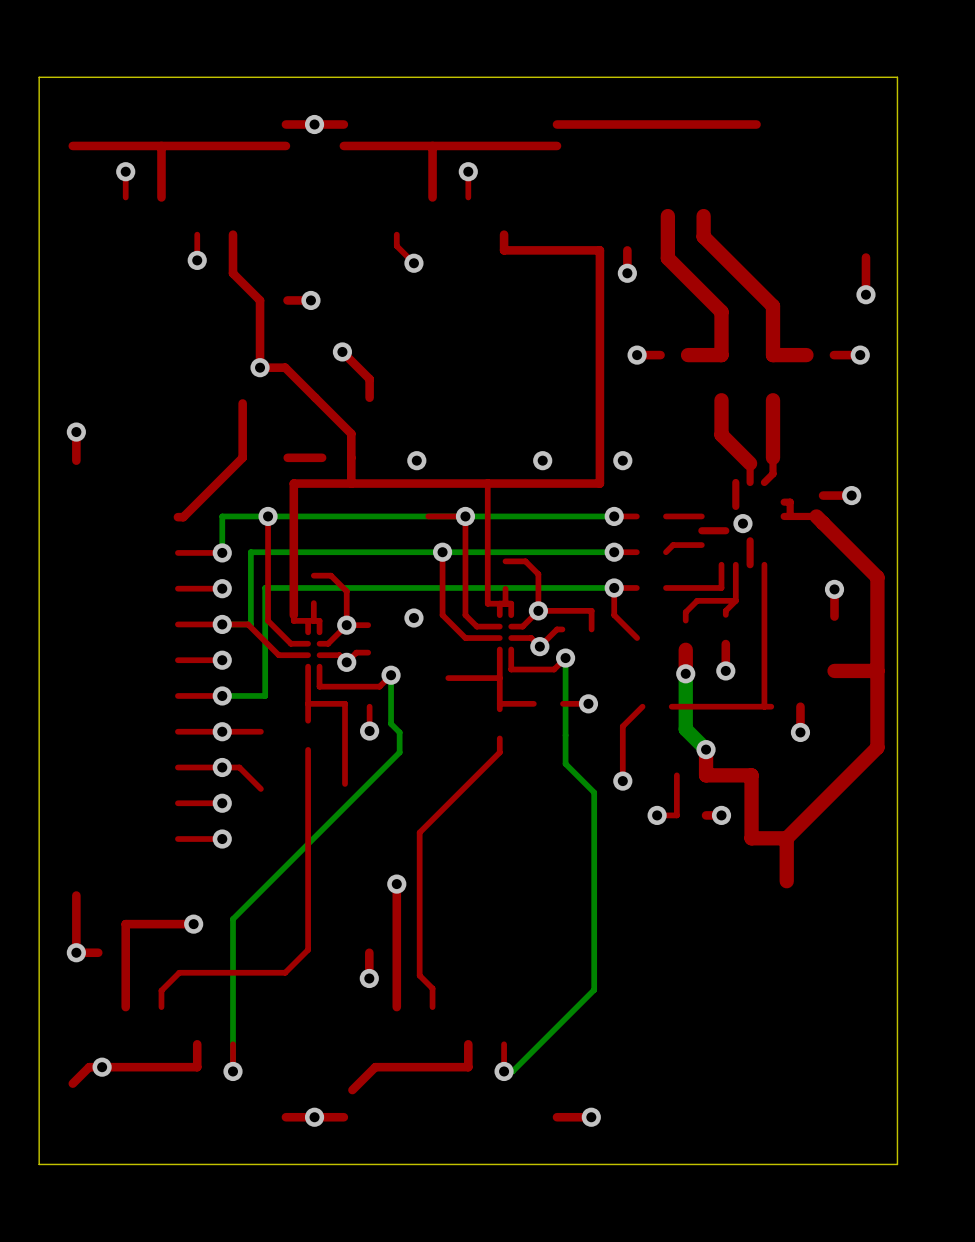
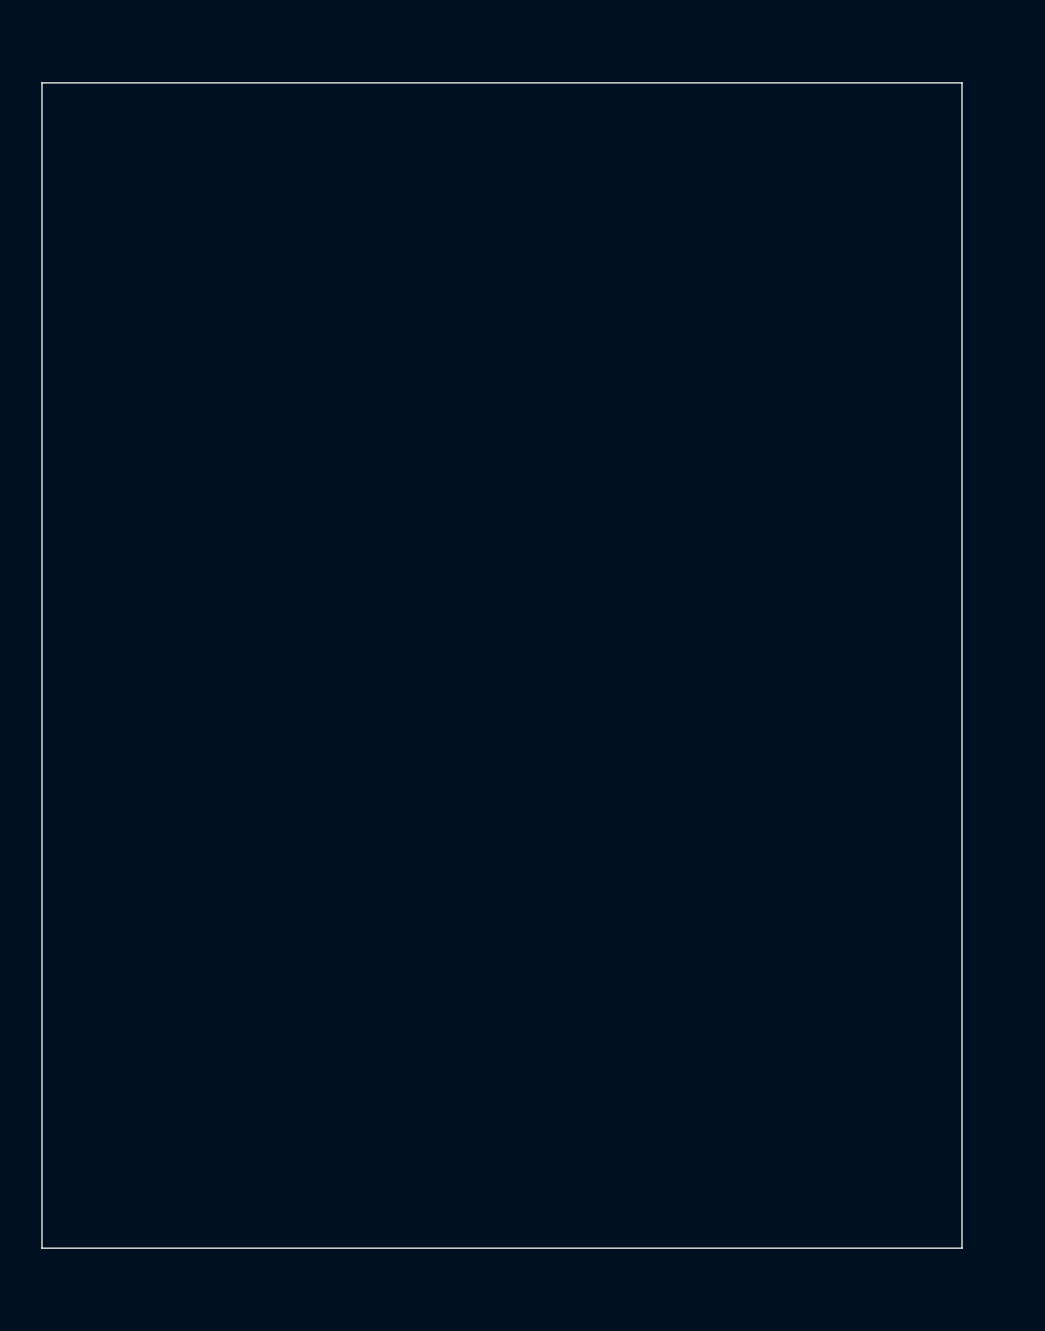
top track: (285, 124) (343, 124) -> none
via: (314, 124) -> none
top track: (557, 124) (756, 124) -> none
top track: (72, 145) (285, 145) -> none
top track: (161, 145) (161, 197) -> none
top track: (343, 145) (557, 145) -> none
top track: (432, 145) (432, 197) -> none
top track: (125, 171) (125, 197) -> none
via: (125, 171) -> none
top track: (468, 171) (468, 197) -> none
via: (468, 171) -> none
top track: (667, 216) (667, 258) (721, 311) (721, 355) (688, 355) -> none
top track: (703, 216) (703, 236) (773, 306) (773, 355) (806, 355) -> none
top track: (197, 234) (197, 260) -> none
top track: (233, 234) (233, 273) (260, 300) (260, 367) (285, 367) (351, 433) (351, 483) -> none
top track: (396, 234) (396, 246) (413, 263) -> none
top track: (504, 234) (504, 250) (599, 250) (599, 483) (293, 483) (293, 620) (319, 620) (319, 632) -> none
top track: (627, 250) (627, 273) -> none
top track: (865, 257) (865, 294) -> none
via: (197, 260) -> none
via: (413, 263) -> none
via: (627, 273) -> none
via: (865, 294) -> none
top track: (287, 300) (310, 300) -> none
via: (310, 300) -> none
top track: (342, 351) (369, 379) (369, 397) -> none
via: (342, 351) -> none
top track: (637, 355) (660, 355) -> none
via: (637, 355) -> none
top track: (833, 355) (860, 355) -> none
via: (860, 355) -> none
via: (260, 367) -> none
top track: (721, 400) (721, 434) (750, 463) (750, 482) -> none
top track: (773, 400) (773, 473) (764, 482) -> none
top track: (242, 403) (242, 457) (183, 517) (177, 517) -> none
top track: (76, 432) (76, 460) -> none
via: (76, 432) -> none
top track: (287, 457) (322, 457) -> none
via: (416, 460) -> none
via: (542, 460) -> none
via: (622, 460) -> none
top track: (735, 482) (735, 506) -> none
top track: (487, 483) (487, 603) (511, 603) (511, 615) -> none
top track: (823, 495) (851, 495) -> none
via: (851, 495) -> none
top track: (784, 502) (790, 502) (790, 516) -> none
top track: (268, 516) (268, 620) (290, 643) (308, 643) -> none
via: (268, 516) -> none
top track: (428, 516) (465, 516) (465, 615) (476, 626) (499, 626) -> none
via: (465, 516) -> none
top track: (614, 516) (636, 516) -> none
bottom track: (614, 516) (222, 516) (222, 552) -> none
via: (614, 516) -> none
top track: (666, 516) (701, 516) -> none
top track: (784, 516) (816, 516) (877, 577) (877, 747) (786, 838) -> none
via: (742, 523) -> none
top track: (701, 530) (725, 530) -> none
top track: (750, 540) (750, 564) -> none
top track: (701, 545) (673, 545) (666, 552) -> none
top track: (177, 552) (222, 552) -> none
via: (222, 552) -> none
top track: (442, 552) (442, 615) (465, 638) (499, 638) -> none
via: (442, 552) -> none
top track: (614, 552) (636, 552) -> none
bottom track: (614, 552) (250, 552) (250, 624) (222, 624) -> none
via: (614, 552) -> none
top track: (505, 561) (525, 561) (538, 574) (538, 610) -> none
top track: (721, 564) (721, 587) (666, 587) -> none
top track: (735, 564) (735, 600) -> none
top track: (764, 564) (764, 706) -> none
top track: (313, 575) (330, 575) (346, 591) (346, 625) -> none
bottom track: (614, 587) (265, 587) (265, 695) (222, 695) -> none
via: (614, 587) -> none
top track: (636, 587) (614, 587) (614, 615) (637, 638) -> none
top track: (177, 588) (222, 588) -> none
via: (222, 588) -> none
top track: (505, 588) (505, 603) -> none
top track: (834, 589) (834, 616) -> none
via: (834, 589) -> none
top track: (735, 600) (725, 610) (725, 614) -> none
top track: (735, 600) (697, 600) (685, 612) (685, 620) -> none
top track: (313, 603) (313, 620) -> none
top track: (499, 603) (499, 615) -> none
top track: (538, 610) (591, 610) (591, 629) -> none
top track: (538, 610) (522, 626) (511, 626) -> none
via: (538, 610) -> none
via: (413, 618) -> none
top track: (308, 620) (308, 632) -> none
top track: (177, 624) (248, 624) (278, 655) (308, 655) -> none
via: (222, 624) -> none
top track: (346, 625) (328, 643) (319, 643) -> none
top track: (346, 625) (368, 625) -> none
via: (346, 625) -> none
top track: (562, 629) (557, 629) (539, 646) (531, 638) (511, 638) -> none
top track: (725, 644) (725, 670) -> none
via: (539, 646) -> none
top track: (499, 649) (499, 709) -> none
top track: (511, 649) (511, 669) (554, 669) (565, 658) -> none
top track: (685, 649) (685, 673) -> none
top track: (368, 652) (356, 652) (346, 662) (339, 655) (319, 655) -> none
bottom track: (565, 658) (565, 763) (594, 792) (594, 989) (512, 1071) (504, 1071) -> none
via: (565, 658) -> none
top track: (177, 660) (222, 660) -> none
via: (222, 660) -> none
via: (346, 662) -> none
top track: (308, 666) (308, 720) -> none
top track: (319, 666) (319, 686) (379, 686) (391, 675) -> none
via: (725, 670) -> none
top track: (834, 670) (877, 670) -> none
bottom track: (685, 673) (685, 729) (706, 749) -> none
via: (685, 673) -> none
bottom track: (391, 675) (391, 723) (399, 732) (399, 752) (233, 919) (233, 1071) -> none
via: (391, 675) -> none
top track: (448, 678) (499, 678) -> none
top track: (177, 695) (222, 695) -> none
via: (222, 695) -> none
top track: (308, 703) (345, 703) (345, 783) -> none
top track: (499, 703) (533, 703) -> none
top track: (563, 703) (588, 703) -> none
via: (588, 703) -> none
top track: (369, 706) (369, 731) -> none
top track: (642, 706) (622, 726) (622, 781) -> none
top track: (671, 706) (771, 706) -> none
top track: (800, 706) (800, 732) -> none
top track: (177, 731) (260, 731) -> none
via: (222, 731) -> none
via: (369, 731) -> none
via: (800, 732) -> none
top track: (499, 738) (499, 752) (419, 832) (419, 975) (432, 988) (432, 1007) -> none
top track: (308, 749) (308, 949) (285, 972) (179, 972) (161, 990) (161, 1007) -> none
top track: (706, 749) (706, 775) (751, 775) (751, 838) (786, 838) -> none
via: (706, 749) -> none
top track: (177, 767) (239, 767) (260, 788) -> none
via: (222, 767) -> none
top track: (676, 775) (676, 815) (657, 815) -> none
via: (622, 781) -> none
top track: (177, 803) (222, 803) -> none
via: (222, 803) -> none
via: (657, 815) -> none
top track: (706, 815) (721, 815) -> none
via: (721, 815) -> none
top track: (786, 838) (786, 881) -> none
top track: (177, 839) (222, 839) -> none
via: (222, 839) -> none
top track: (396, 884) (396, 1007) -> none
via: (396, 884) -> none
top track: (76, 895) (76, 952) (98, 952) -> none
top track: (193, 924) (125, 924) (125, 1007) -> none
via: (193, 924) -> none
via: (76, 952) -> none
top track: (369, 952) (369, 978) -> none
via: (369, 978) -> none
top track: (197, 1044) (197, 1067) (89, 1067) (72, 1083) -> none
top track: (233, 1044) (233, 1071) -> none
top track: (468, 1044) (468, 1067) (375, 1067) (352, 1090) -> none
top track: (504, 1044) (504, 1071) -> none
via: (102, 1067) -> none
via: (233, 1071) -> none
via: (504, 1071) -> none
top track: (285, 1117) (343, 1117) -> none
via: (314, 1117) -> none
top track: (557, 1117) (591, 1117) -> none
via: (591, 1117) -> none

